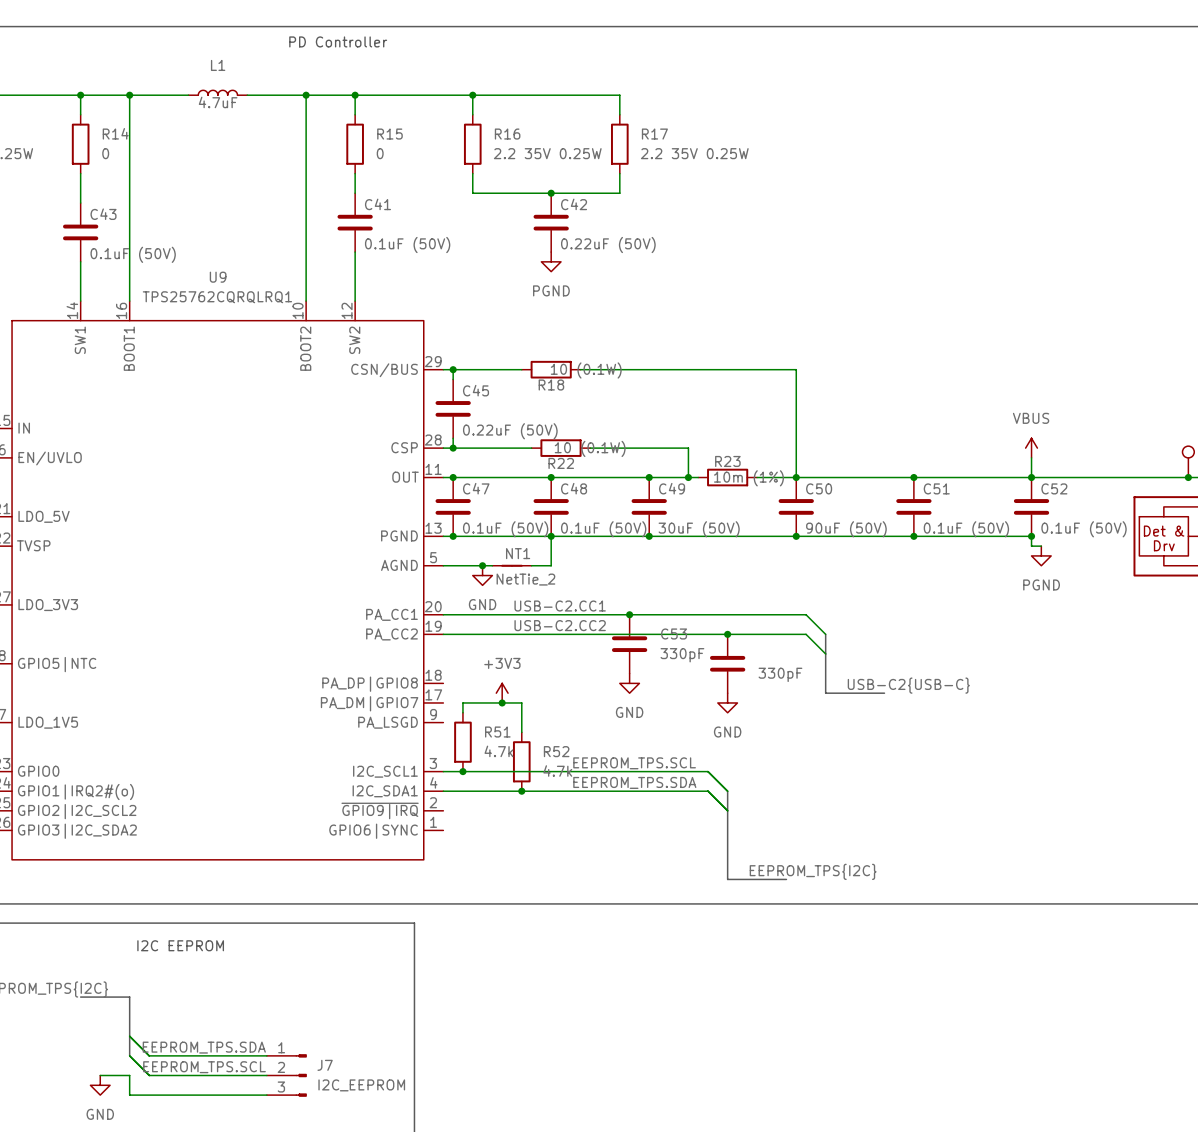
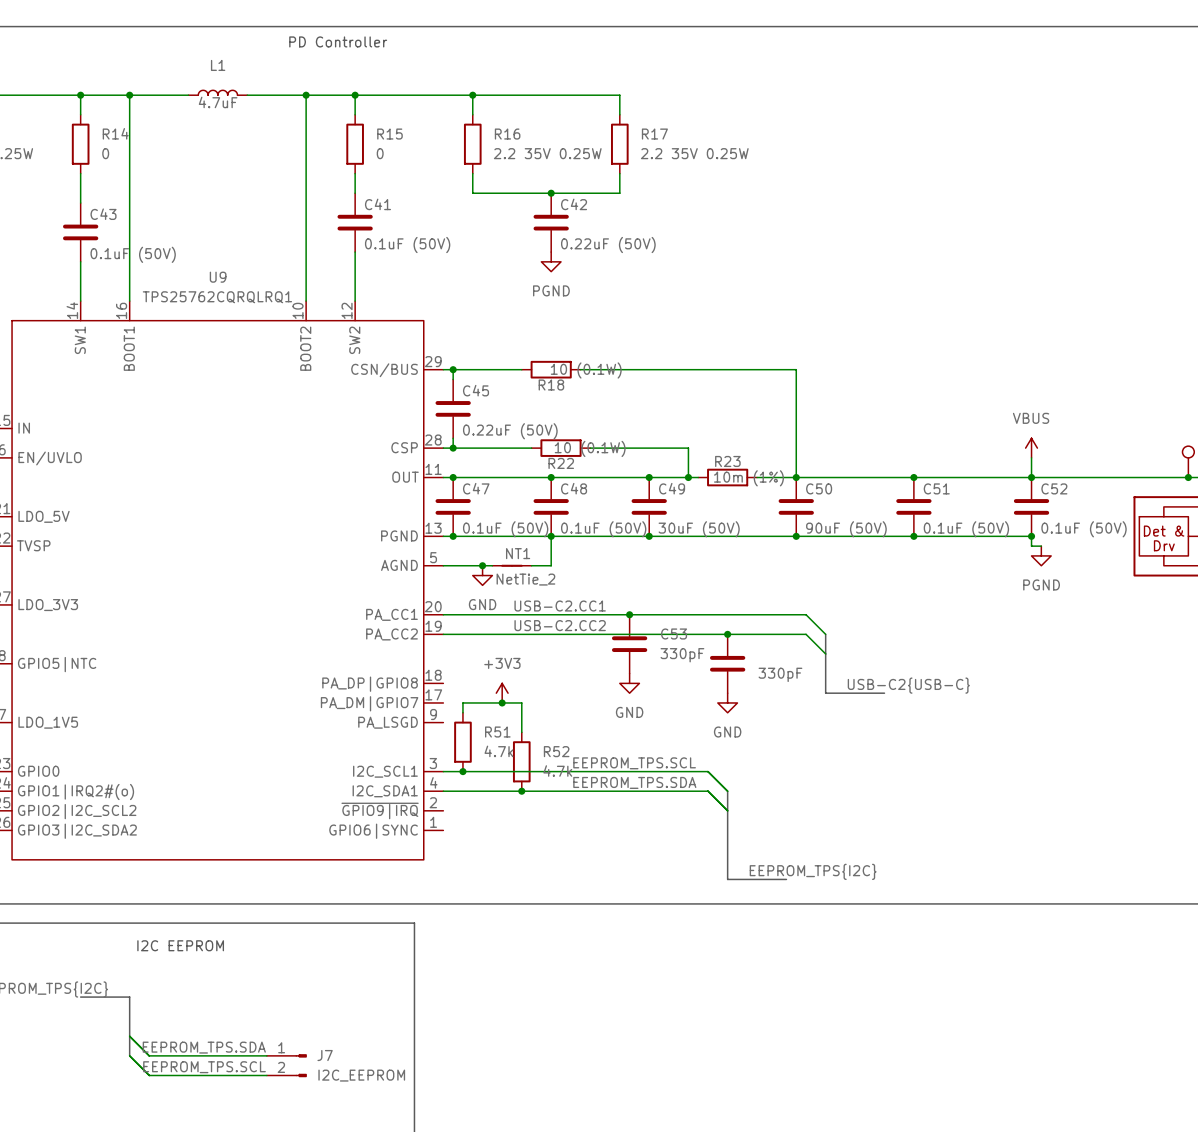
J7 symbol: [266, 1054, 307, 1097] -> [266, 1054, 307, 1078]
wire: (100, 1075) (129, 1075) (129, 1095) (266, 1095) -> none
power symbol: GND (100, 1085) -> none

